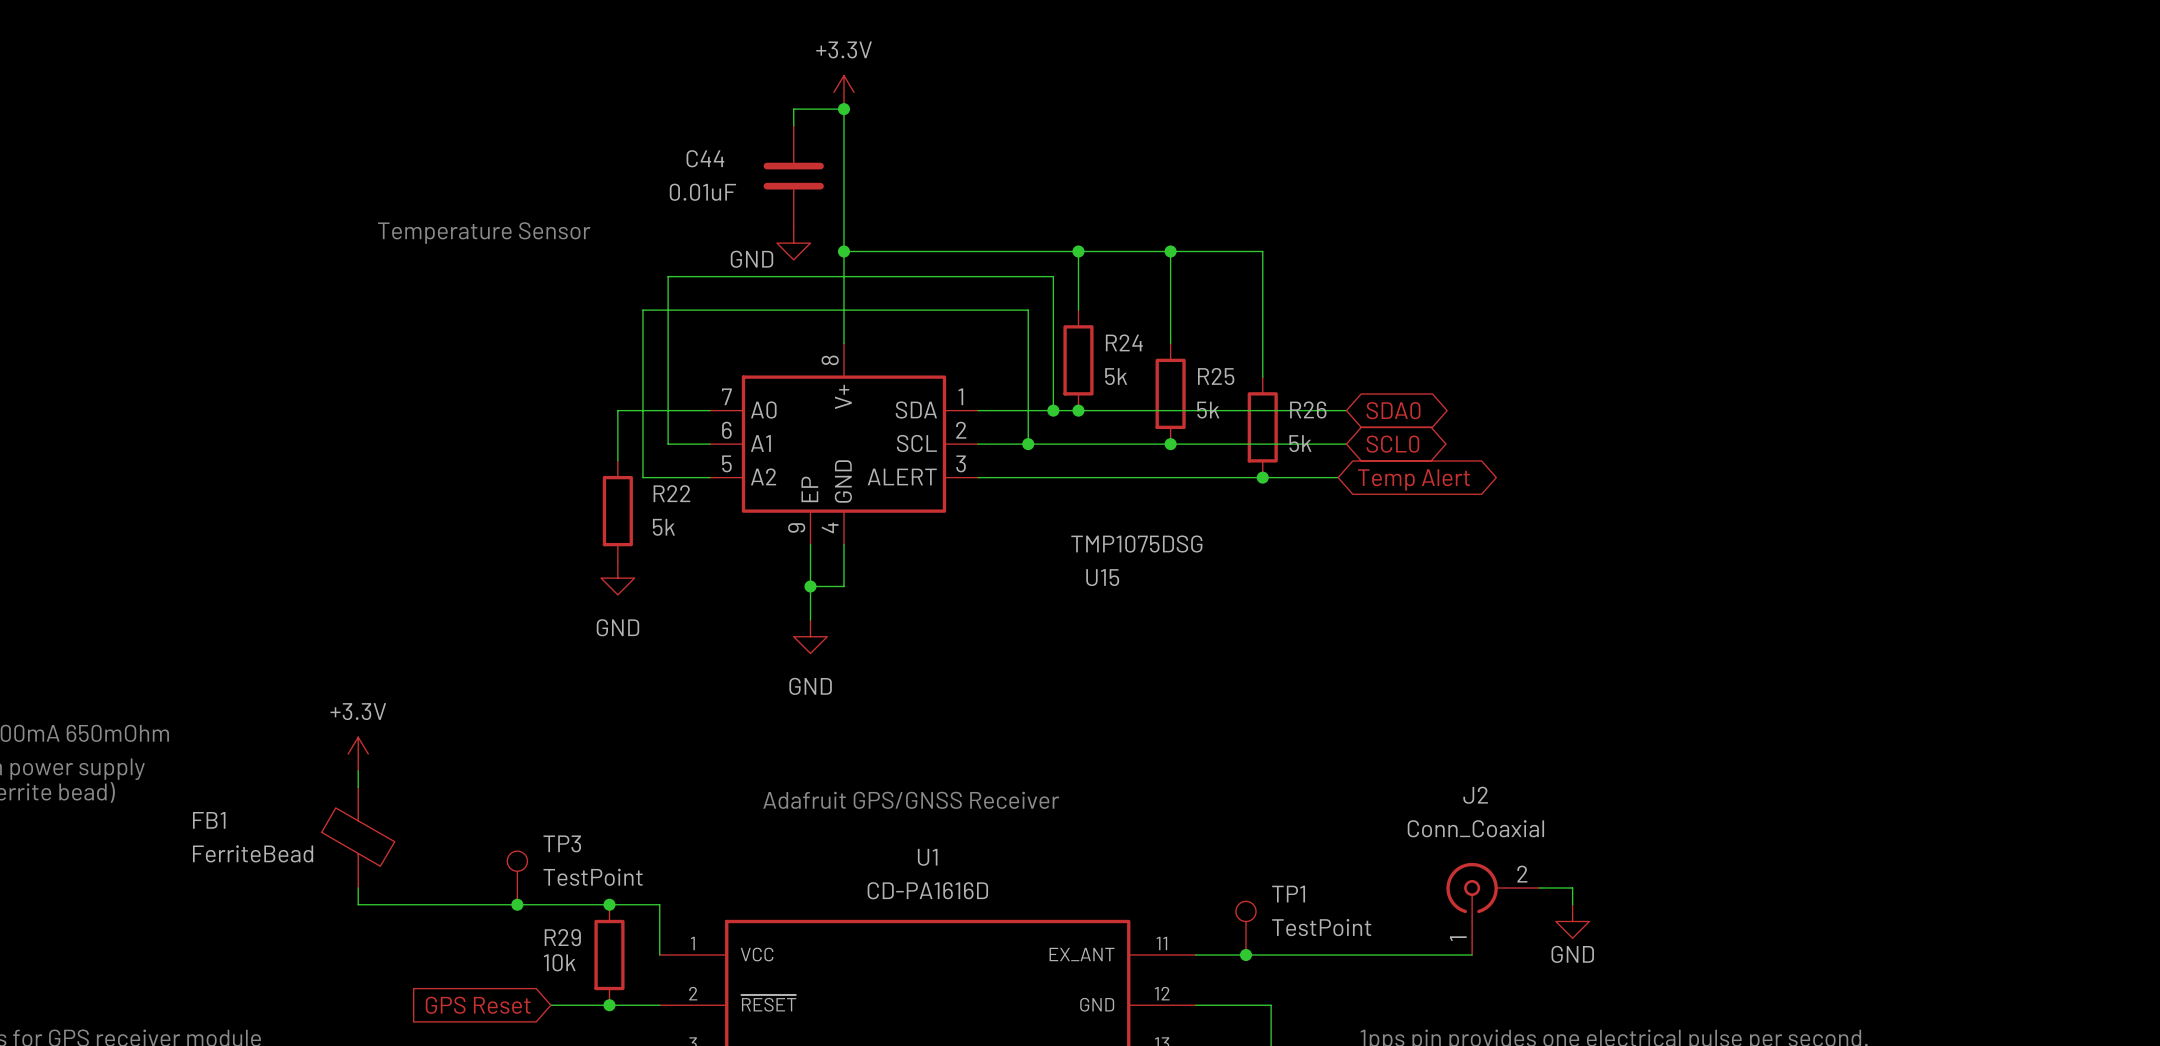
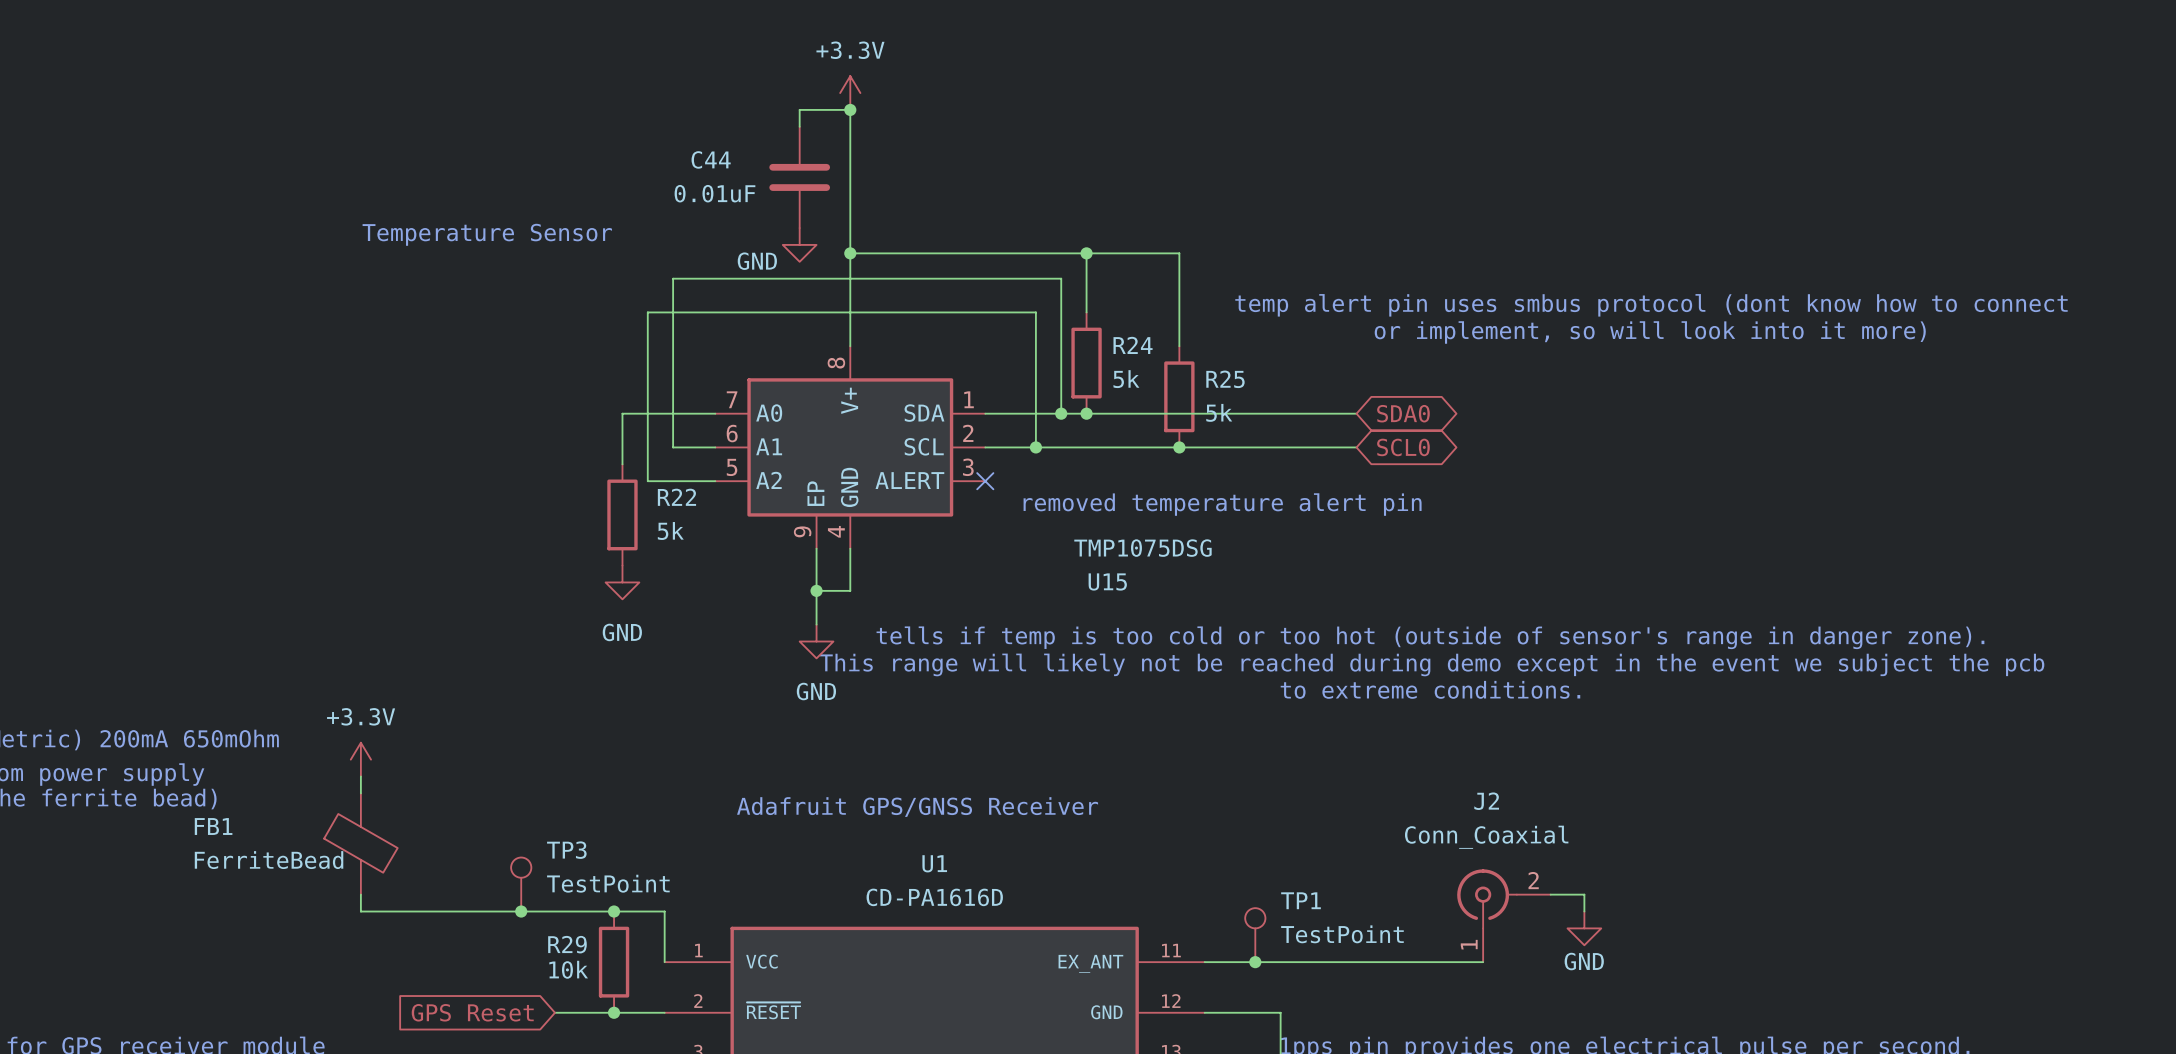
wire: (1170, 251) (1262, 251) (1262, 377) -> none
junction: (1170, 251) -> none
text: none -> temp alert pin uses smbus protocol (dont know how to connect (1651, 305)
text: none -> or implement, so will look into it more) (1650, 332)
R26: 5k (1262, 427) -> none
wire: (977, 477) (1338, 477) -> none
no-connect mark: none -> (985, 481)
junction: (1262, 477) -> none
global label: Temp Alert (1413, 479) -> none
text: none -> removed temperature alert pin (1222, 504)
text: none -> tells if temp is too cold or too hot (outside of sensor's range in danger zone). (1430, 637)
text: none -> This range will likely not be reached during demo except in the event we subject the pcb (1432, 664)
text: none -> to extreme conditions. (1430, 689)

